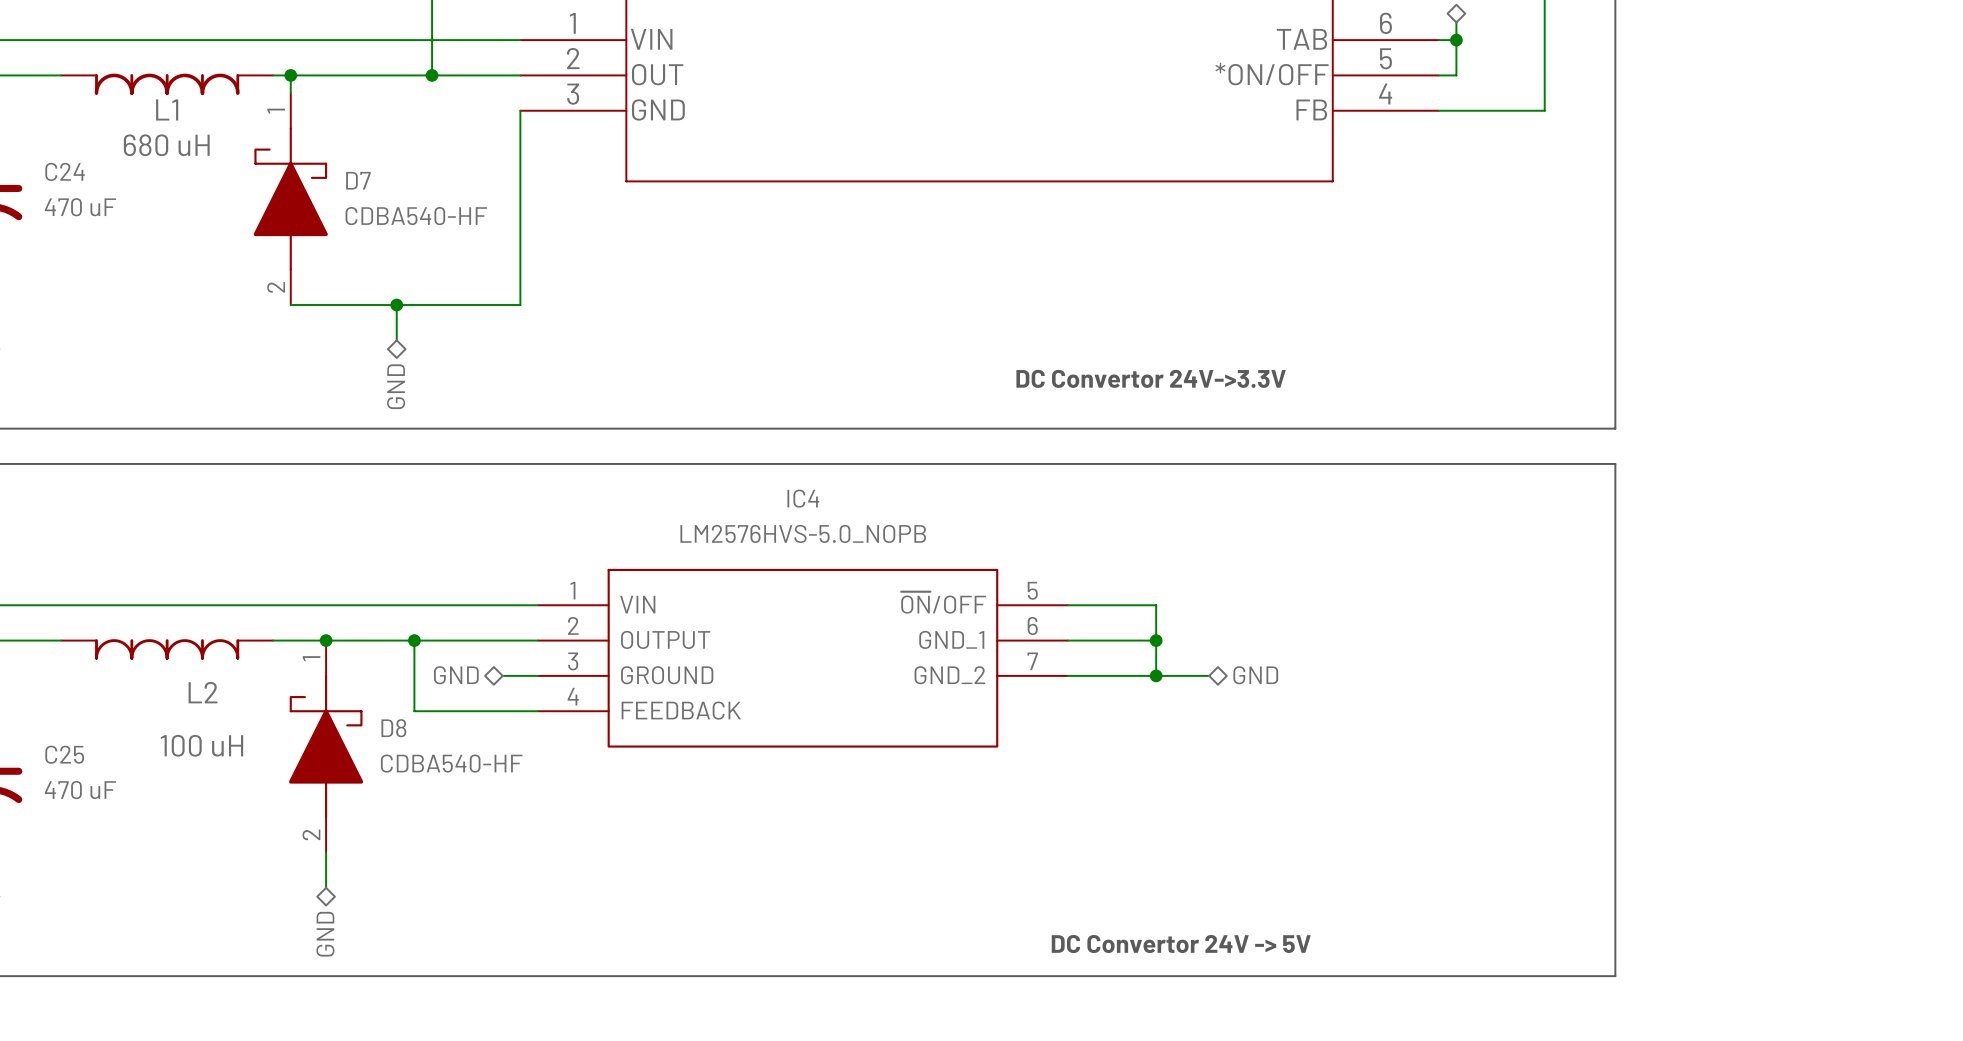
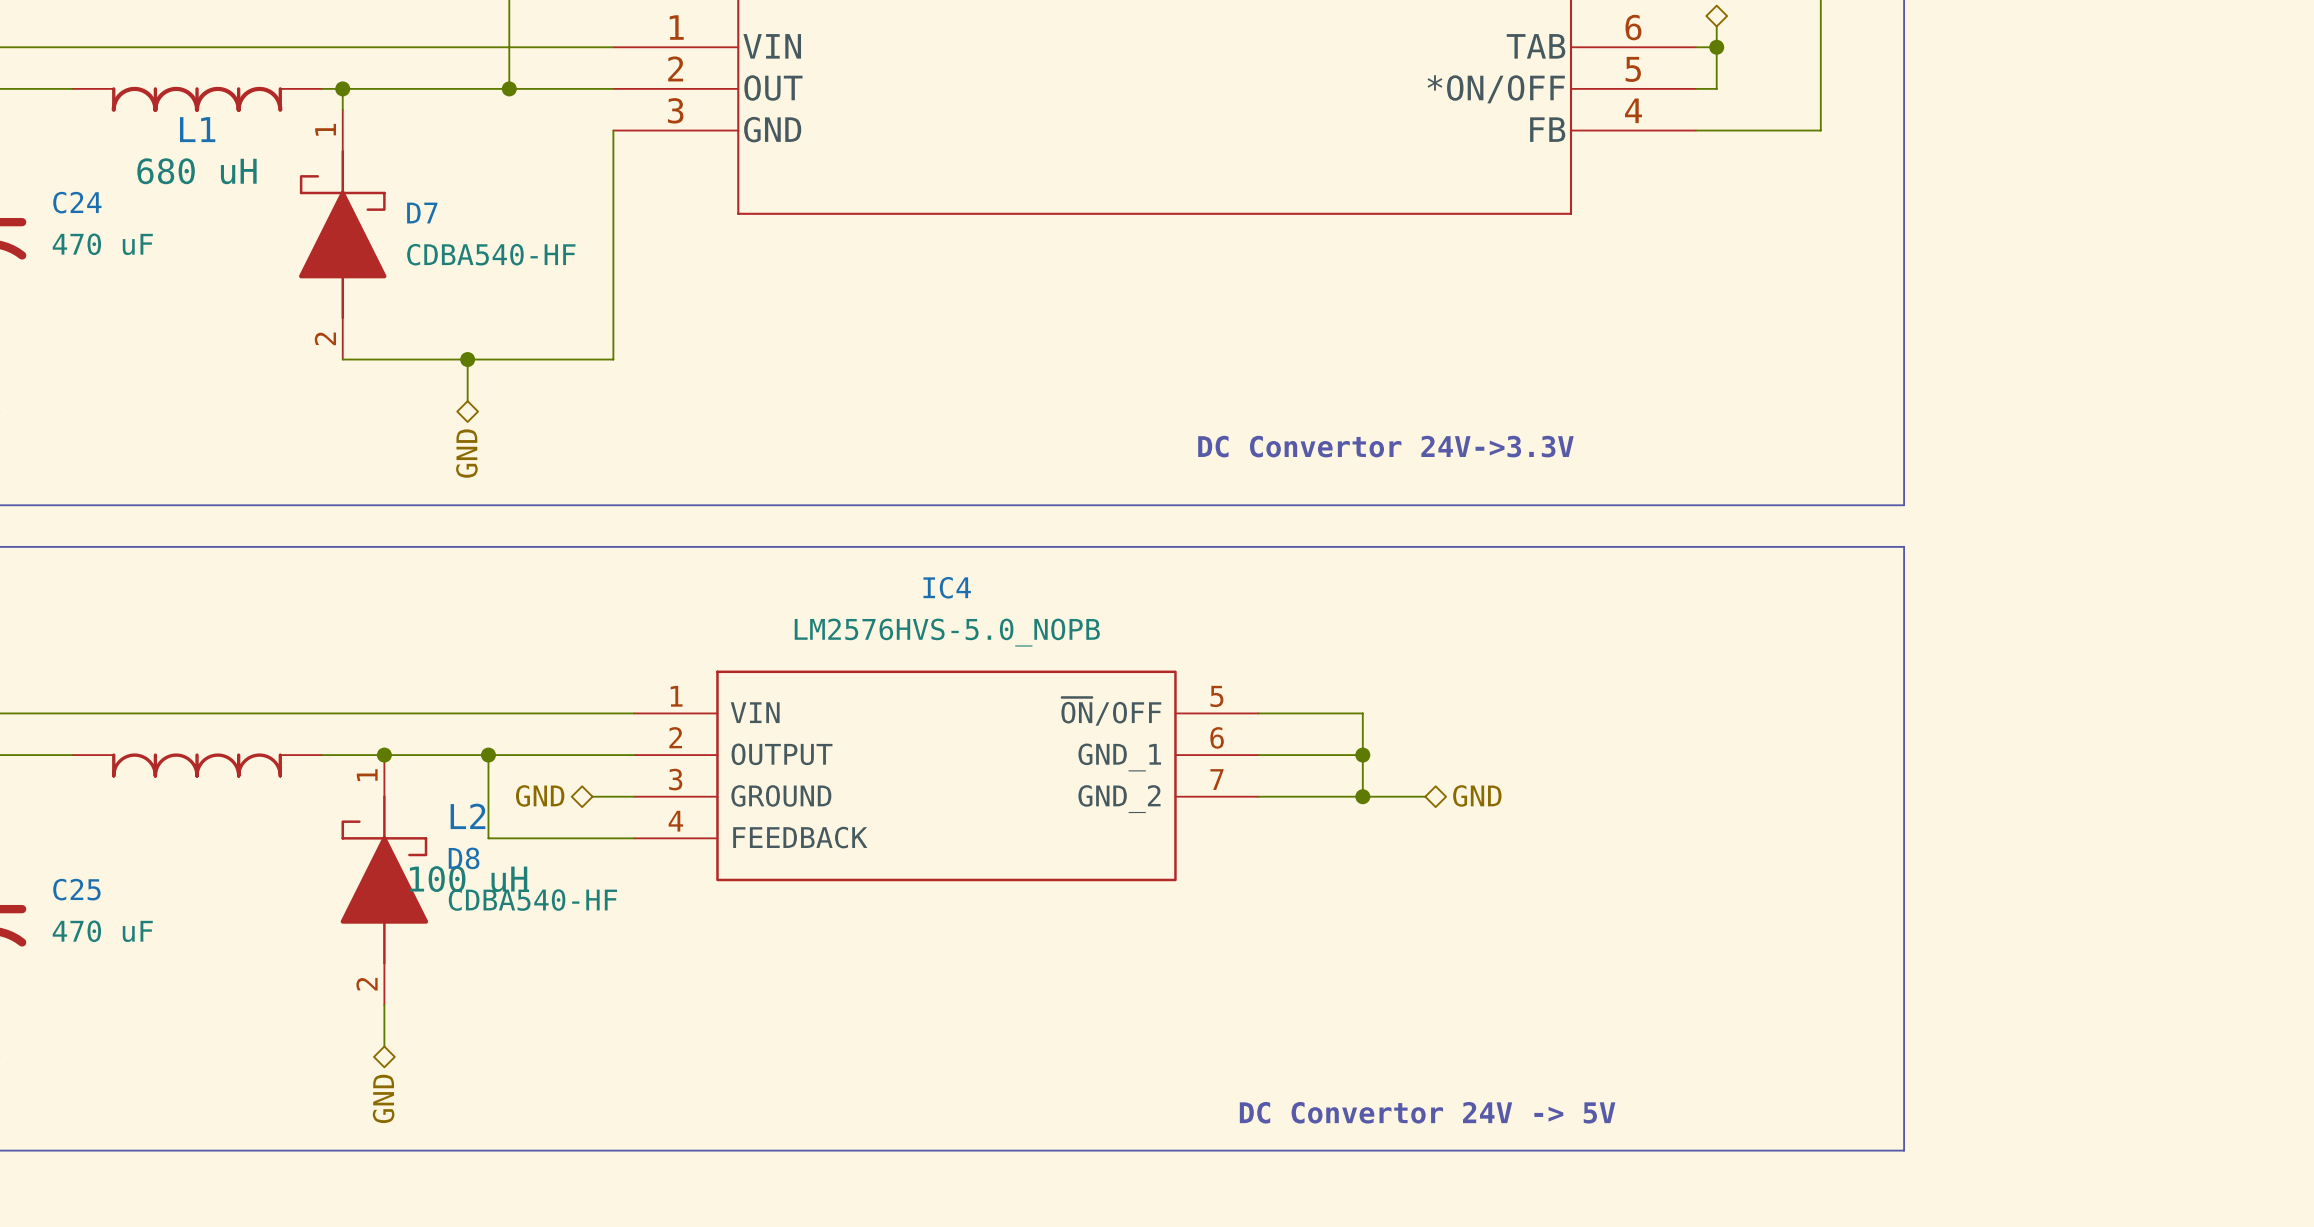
L2 name position: L2 (203, 692) -> L2 (468, 816)
L2 value position: 100 uH (201, 745) -> 100 uH (468, 879)

